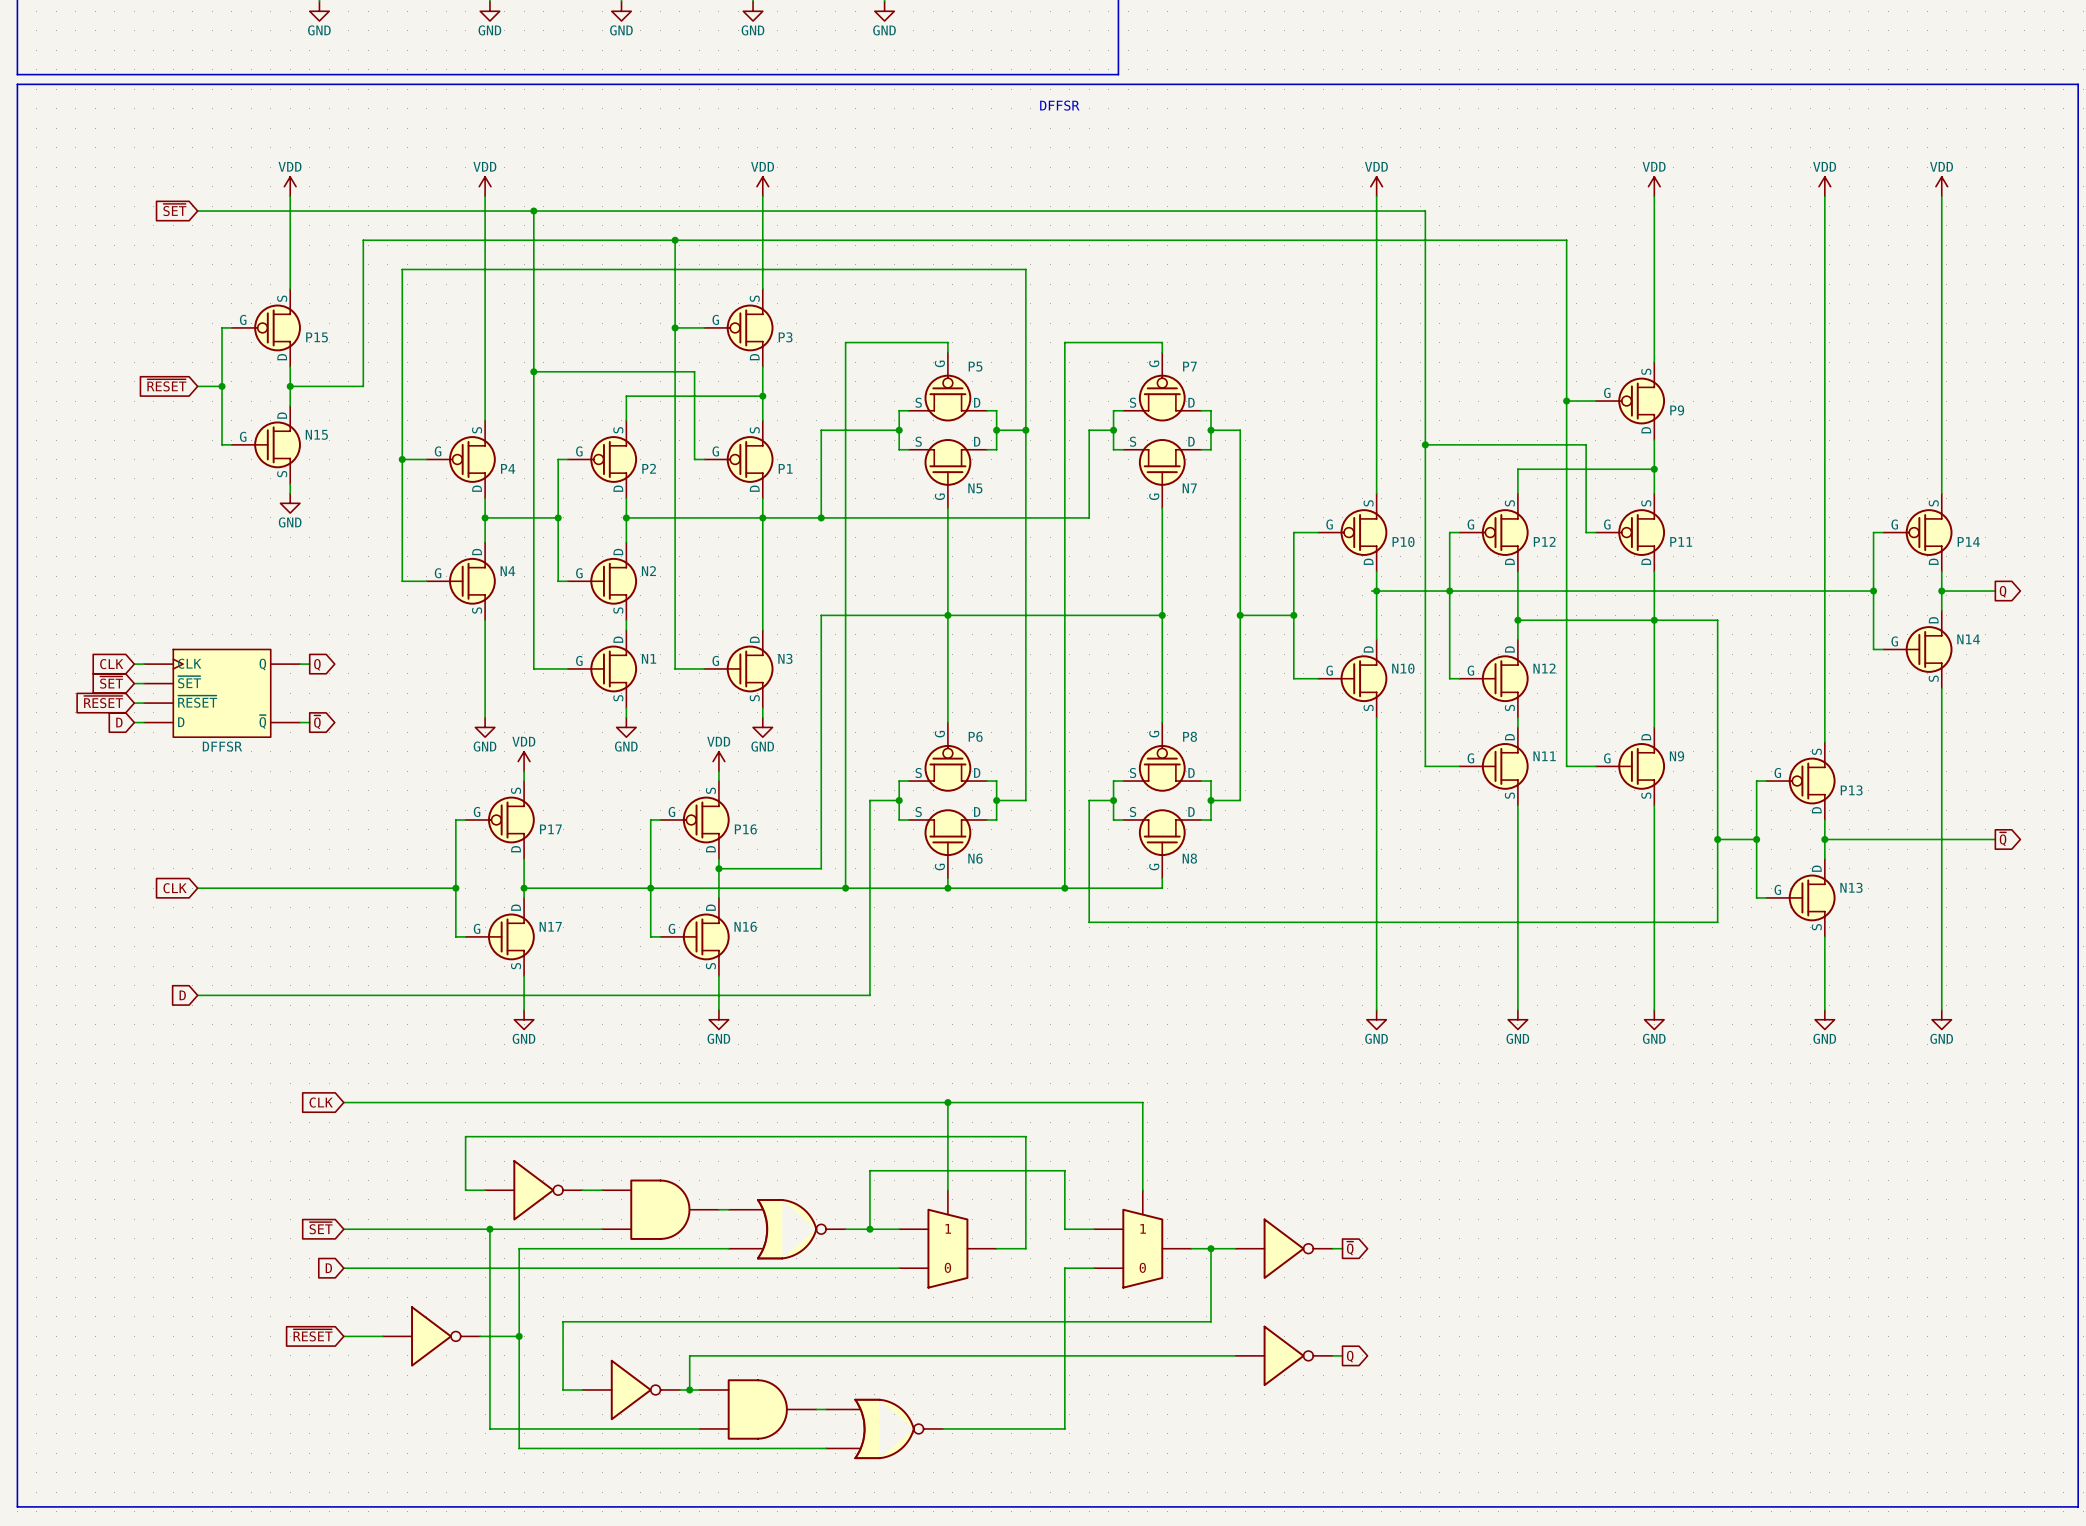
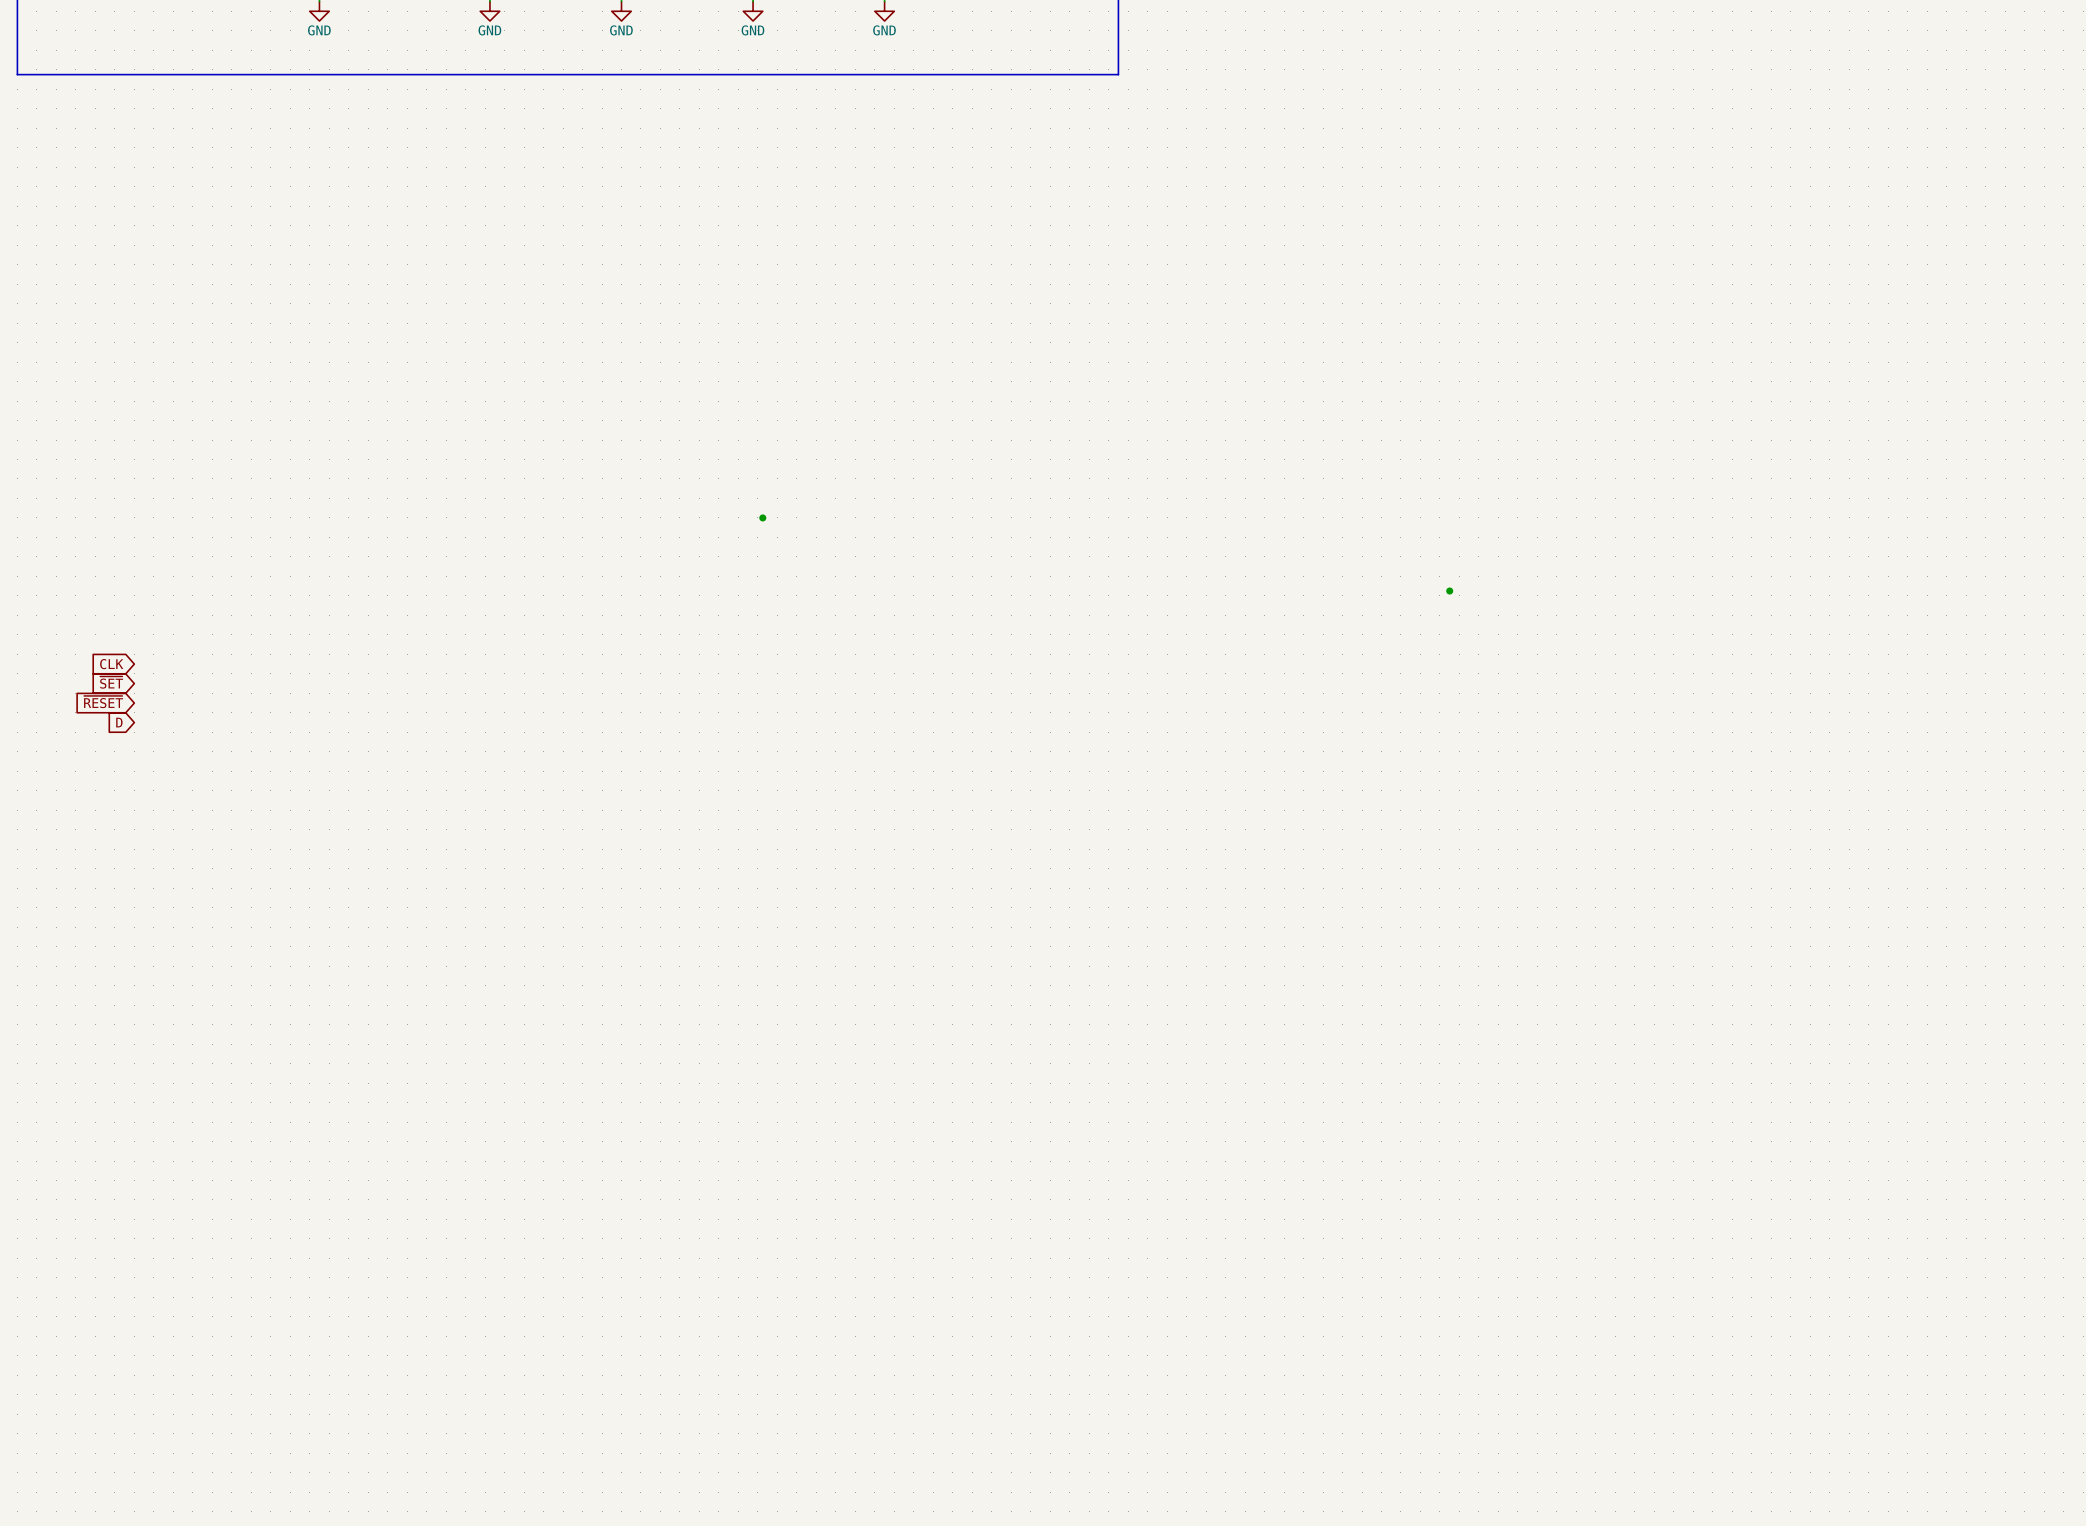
line: (17, 84) (2078, 84) (2078, 1506) (17, 1506) (17, 84) -> none
text: DFFSR (1059, 105) -> none
power symbol: VDD (290, 186) -> none
power symbol: VDD (485, 186) -> none
power symbol: VDD (762, 186) -> none
power symbol: VDD (1376, 186) -> none
power symbol: VDD (1654, 186) -> none
power symbol: VDD (1824, 186) -> none
power symbol: VDD (1941, 186) -> none
wire: (290, 196) (290, 288) -> none
wire: (485, 196) (485, 420) -> none
wire: (762, 196) (762, 288) -> none
wire: (1376, 196) (1376, 493) -> none
wire: (1654, 196) (1654, 362) -> none
wire: (1824, 196) (1824, 742) -> none
wire: (1941, 196) (1941, 493) -> none
global label: ~{SET} (174, 210) -> none
wire: (197, 211) (1425, 211) (1425, 766) (1459, 766) -> none
wire: (533, 211) (533, 668) (567, 668) -> none
junction: (533, 211) -> none
wire: (675, 240) (675, 668) (704, 668) -> none
junction: (675, 240) -> none
wire: (231, 327) (222, 327) (222, 444) (231, 444) -> none
P15: (266, 327) -> none
wire: (675, 327) (704, 327) -> none
junction: (675, 327) -> none
P3: (738, 327) -> none
wire: (947, 352) (947, 342) (845, 342) (845, 888) -> none
wire: (1162, 352) (1162, 342) (1064, 342) (1064, 888) -> none
wire: (290, 366) (290, 405) -> none
wire: (762, 366) (762, 420) -> none
wire: (533, 371) (694, 371) (694, 459) (704, 459) -> none
junction: (533, 371) -> none
global label: ~{RESET} (166, 385) -> none
wire: (197, 386) (222, 386) -> none
junction: (222, 386) -> none
wire: (290, 386) (363, 386) (363, 240) (1566, 240) (1566, 766) (1595, 766) -> none
junction: (290, 386) -> none
P5: (947, 386) -> none
P7: (1162, 386) -> none
wire: (762, 396) (626, 396) (626, 420) -> none
junction: (762, 396) -> none
wire: (1566, 401) (1595, 401) -> none
junction: (1566, 401) -> none
P9: (1630, 401) -> none
wire: (908, 410) (899, 410) (899, 449) (908, 449) -> none
wire: (986, 410) (996, 410) (996, 449) (986, 449) -> none
wire: (1123, 410) (1113, 410) (1113, 449) (1123, 449) -> none
wire: (1201, 410) (1210, 410) (1210, 449) (1201, 449) -> none
wire: (899, 430) (821, 430) (821, 517) -> none
junction: (899, 430) -> none
wire: (996, 430) (1025, 430) -> none
junction: (996, 430) -> none
junction: (1025, 430) -> none
wire: (1113, 430) (1089, 430) (1089, 517) (626, 517) -> none
junction: (1113, 430) -> none
wire: (1210, 430) (1240, 430) (1240, 800) (1210, 800) -> none
junction: (1210, 430) -> none
wire: (1654, 440) (1654, 493) -> none
N15: (266, 444) -> none
wire: (1425, 444) (1586, 444) (1586, 532) (1595, 532) -> none
junction: (1425, 444) -> none
wire: (402, 459) (426, 459) -> none
junction: (402, 459) -> none
P4: (461, 459) -> none
wire: (567, 459) (558, 459) (558, 581) (567, 581) -> none
P2: (602, 459) -> none
P1: (738, 459) -> none
wire: (1654, 469) (1517, 469) (1517, 493) -> none
junction: (1654, 469) -> none
N5: (947, 473) -> none
N7: (1162, 473) -> none
wire: (290, 483) (290, 493) -> none
wire: (485, 498) (485, 542) -> none
wire: (626, 498) (626, 542) -> none
wire: (762, 498) (762, 629) -> none
power symbol: GND (290, 503) -> none
wire: (947, 508) (947, 722) -> none
wire: (1162, 508) (1162, 722) -> none
wire: (485, 517) (558, 517) -> none
junction: (485, 517) -> none
junction: (558, 517) -> none
junction: (626, 517) -> none
junction: (821, 517) -> none
wire: (1318, 532) (1293, 532) (1293, 678) (1318, 678) -> none
P10: (1352, 532) -> none
wire: (1459, 532) (1449, 532) (1449, 678) (1459, 678) -> none
P12: (1494, 532) -> none
P11: (1630, 532) -> none
wire: (1883, 532) (1873, 532) (1873, 649) (1883, 649) -> none
P14: (1917, 532) -> none
wire: (1376, 571) (1376, 639) -> none
wire: (1517, 571) (1517, 639) -> none
wire: (1654, 571) (1654, 727) -> none
wire: (1941, 571) (1941, 610) -> none
wire: (426, 581) (402, 581) (402, 269) (1025, 269) (1025, 800) (996, 800) -> none
N4: (461, 581) -> none
N2: (602, 581) -> none
wire: (1371, 591) (1873, 591) -> none
junction: (1376, 591) -> none
junction: (1873, 591) -> none
wire: (1941, 591) (1995, 591) -> none
junction: (1941, 591) -> none
global label: Q (2003, 591) -> none
junction: (947, 615) -> none
wire: (1162, 615) (821, 615) (821, 868) (718, 868) -> none
junction: (1162, 615) -> none
wire: (1240, 615) (1293, 615) -> none
junction: (1240, 615) -> none
junction: (1293, 615) -> none
wire: (485, 620) (485, 717) -> none
wire: (626, 620) (626, 629) -> none
wire: (1517, 620) (1717, 620) (1717, 922) (1089, 922) (1089, 800) (1113, 800) -> none
junction: (1517, 620) -> none
junction: (1654, 620) -> none
N14: (1917, 649) -> none
wire: (134, 664) (144, 664) -> none
wire: (299, 664) (309, 664) -> none
global label: Q (317, 664) -> none
N1: (602, 668) -> none
N3: (738, 668) -> none
N10: (1352, 678) -> none
N12: (1494, 678) -> none
wire: (134, 683) (144, 683) -> none
wire: (1941, 688) (1941, 1009) -> none
part: DFFSR (222, 693) -> none
wire: (134, 703) (144, 703) -> none
wire: (626, 707) (626, 717) -> none
wire: (762, 707) (762, 717) -> none
wire: (1376, 717) (1376, 1009) -> none
wire: (1517, 717) (1517, 727) -> none
wire: (134, 722) (144, 722) -> none
wire: (299, 722) (309, 722) -> none
global label: ~{Q} (317, 722) -> none
power symbol: GND (485, 727) -> none
power symbol: GND (626, 727) -> none
power symbol: GND (762, 727) -> none
P6: (947, 757) -> none
P8: (1162, 757) -> none
power symbol: VDD (524, 761) -> none
power symbol: VDD (718, 761) -> none
N11: (1494, 766) -> none
N9: (1630, 766) -> none
wire: (524, 771) (524, 781) -> none
wire: (718, 771) (718, 781) -> none
wire: (908, 781) (899, 781) (899, 819) (908, 819) -> none
wire: (986, 781) (996, 781) (996, 819) (986, 819) -> none
wire: (1123, 781) (1113, 781) (1113, 819) (1123, 819) -> none
wire: (1201, 781) (1210, 781) (1210, 819) (1201, 819) -> none
wire: (1766, 781) (1756, 781) (1756, 897) (1766, 897) -> none
P13: (1800, 781) -> none
wire: (899, 800) (869, 800) (869, 995) (197, 995) -> none
junction: (899, 800) -> none
junction: (996, 800) -> none
junction: (1113, 800) -> none
junction: (1210, 800) -> none
wire: (1517, 805) (1517, 1009) -> none
wire: (1654, 805) (1654, 1009) -> none
wire: (465, 819) (455, 819) (455, 936) (465, 936) -> none
P17: (500, 819) -> none
wire: (660, 819) (650, 819) (650, 936) (660, 936) -> none
P16: (695, 819) -> none
wire: (1824, 819) (1824, 858) -> none
wire: (1717, 839) (1756, 839) -> none
junction: (1717, 839) -> none
junction: (1756, 839) -> none
wire: (1824, 839) (1995, 839) -> none
junction: (1824, 839) -> none
global label: ~{Q} (2003, 839) -> none
N6: (947, 843) -> none
N8: (1162, 843) -> none
wire: (524, 858) (524, 897) -> none
wire: (718, 858) (718, 897) -> none
junction: (718, 868) -> none
wire: (947, 878) (947, 888) -> none
wire: (1162, 878) (1162, 888) (524, 888) -> none
global label: CLK (175, 888) -> none
wire: (197, 888) (455, 888) -> none
junction: (455, 888) -> none
junction: (524, 888) -> none
junction: (650, 888) -> none
junction: (845, 888) -> none
junction: (947, 888) -> none
junction: (1064, 888) -> none
N13: (1800, 897) -> none
N17: (500, 936) -> none
N16: (695, 936) -> none
wire: (1824, 936) (1824, 1009) -> none
wire: (524, 975) (524, 1009) -> none
wire: (718, 975) (718, 1009) -> none
global label: D (182, 995) -> none
power symbol: GND (524, 1019) -> none
power symbol: GND (718, 1019) -> none
power symbol: GND (1376, 1019) -> none
power symbol: GND (1517, 1019) -> none
power symbol: GND (1654, 1019) -> none
power symbol: GND (1824, 1019) -> none
power symbol: GND (1941, 1019) -> none
global label: CLK (321, 1102) -> none
wire: (343, 1102) (1142, 1102) (1142, 1190) -> none
wire: (947, 1102) (947, 1190) -> none
junction: (947, 1102) -> none
wire: (485, 1190) (465, 1190) (465, 1136) (1025, 1136) (1025, 1248) (996, 1248) -> none
part: (533, 1190) -> none
wire: (582, 1190) (602, 1190) -> none
part: (660, 1209) -> none
wire: (718, 1209) (728, 1209) -> none
global label: ~{SET} (321, 1228) -> none
wire: (343, 1229) (602, 1229) -> none
wire: (489, 1229) (489, 1428) (699, 1428) -> none
junction: (489, 1229) -> none
part: (787, 1229) -> none
wire: (845, 1229) (899, 1229) -> none
wire: (869, 1229) (869, 1170) (1064, 1170) (1064, 1229) (1094, 1229) -> none
junction: (869, 1229) -> none
part: (947, 1239) -> none
part: (1142, 1239) -> none
wire: (728, 1248) (519, 1248) (519, 1448) (826, 1448) -> none
wire: (1191, 1248) (1235, 1248) -> none
wire: (1210, 1248) (1210, 1321) (563, 1321) (563, 1389) (582, 1389) -> none
junction: (1210, 1248) -> none
part: (1284, 1248) -> none
wire: (1332, 1248) (1342, 1248) -> none
global label: ~{Q} (1350, 1248) -> none
global label: D (328, 1268) -> none
wire: (343, 1268) (899, 1268) -> none
wire: (1094, 1268) (1064, 1268) (1064, 1428) (943, 1428) -> none
global label: ~{RESET} (313, 1335) -> none
wire: (343, 1336) (382, 1336) -> none
part: (431, 1336) -> none
wire: (480, 1336) (519, 1336) -> none
junction: (519, 1336) -> none
wire: (1235, 1355) (689, 1355) (689, 1389) -> none
part: (1284, 1355) -> none
wire: (1332, 1355) (1342, 1355) -> none
global label: Q (1350, 1356) -> none
part: (631, 1389) -> none
wire: (679, 1389) (699, 1389) -> none
junction: (689, 1389) -> none
part: (757, 1409) -> none
wire: (816, 1409) (826, 1409) -> none
part: (884, 1428) -> none

